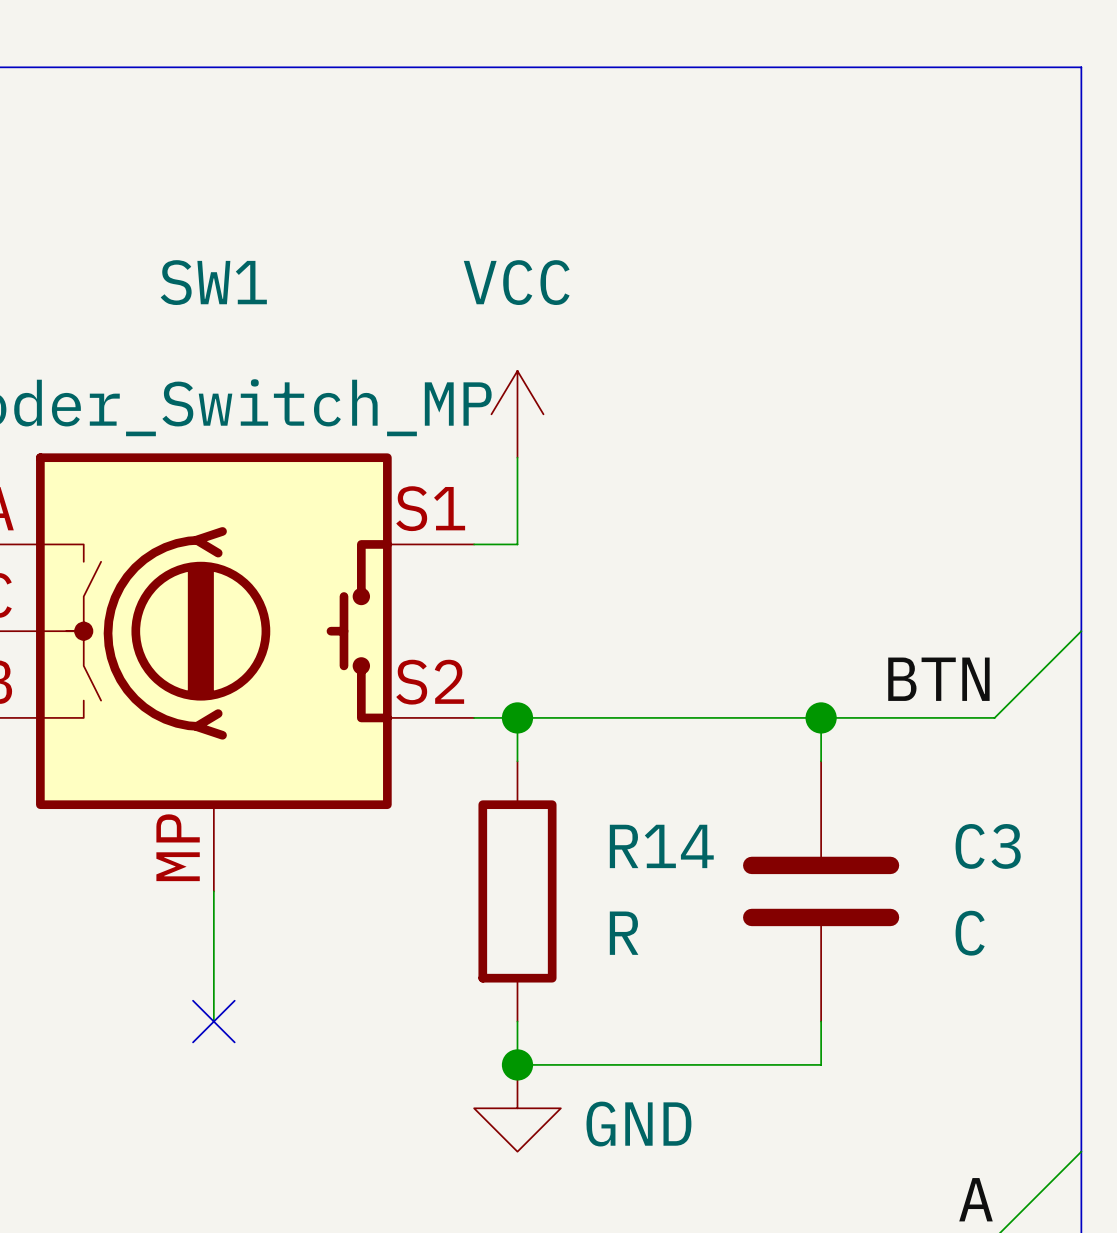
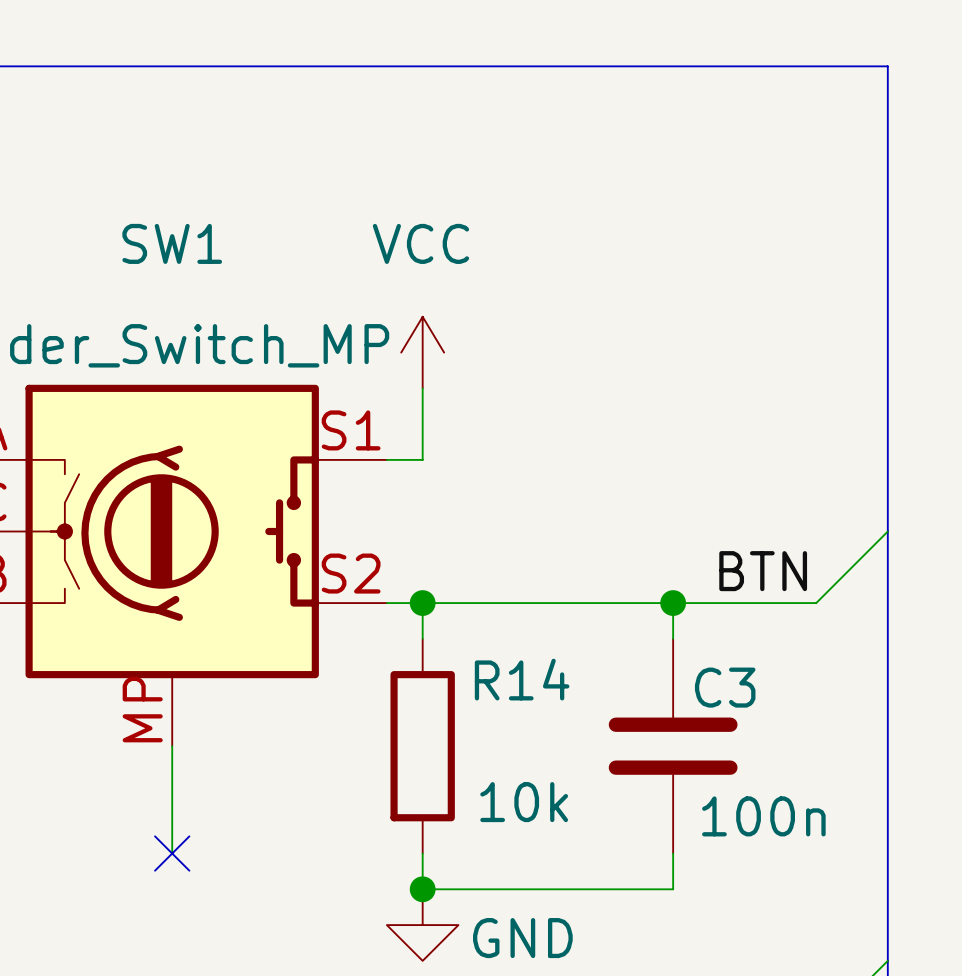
R14 name position: R14 (661, 846) -> R14 (522, 679)
C3 name position: C3 (988, 846) -> C3 (725, 687)
R14 value: R (624, 933) -> 10k (524, 802)
C3 value: C (970, 933) -> 100n (763, 816)

